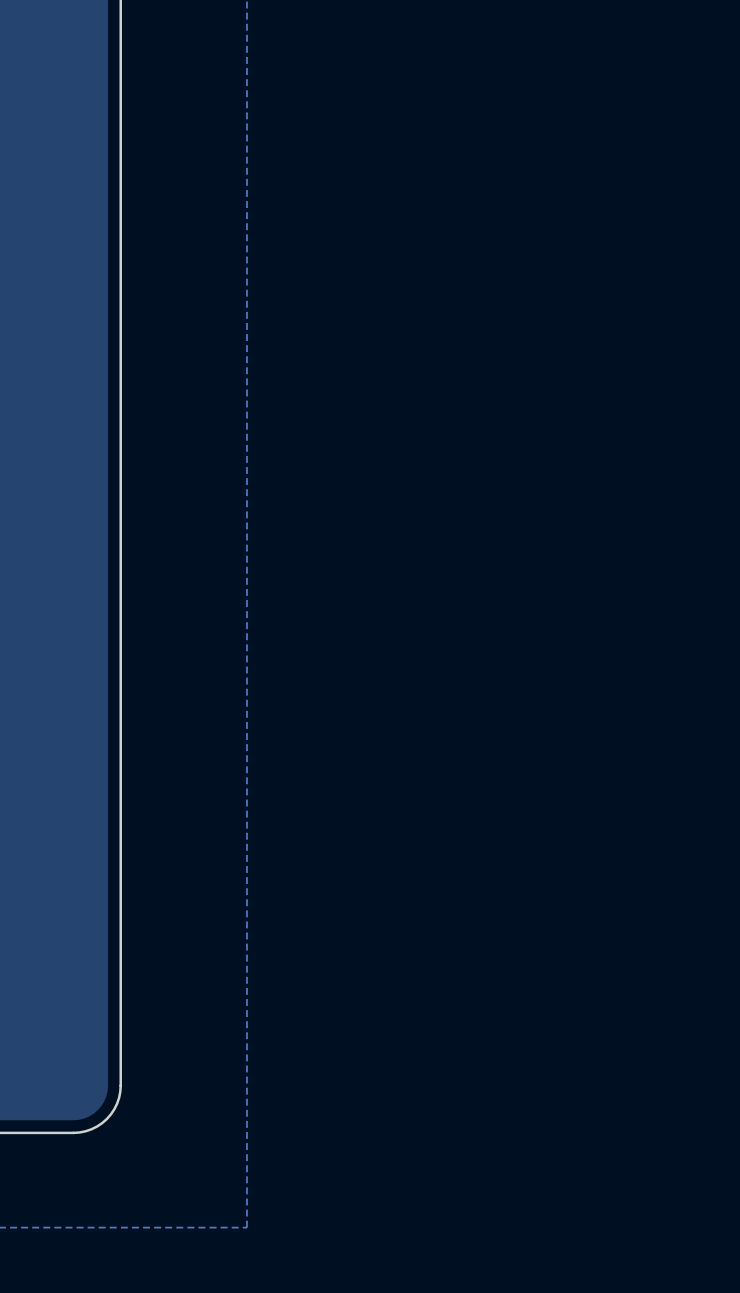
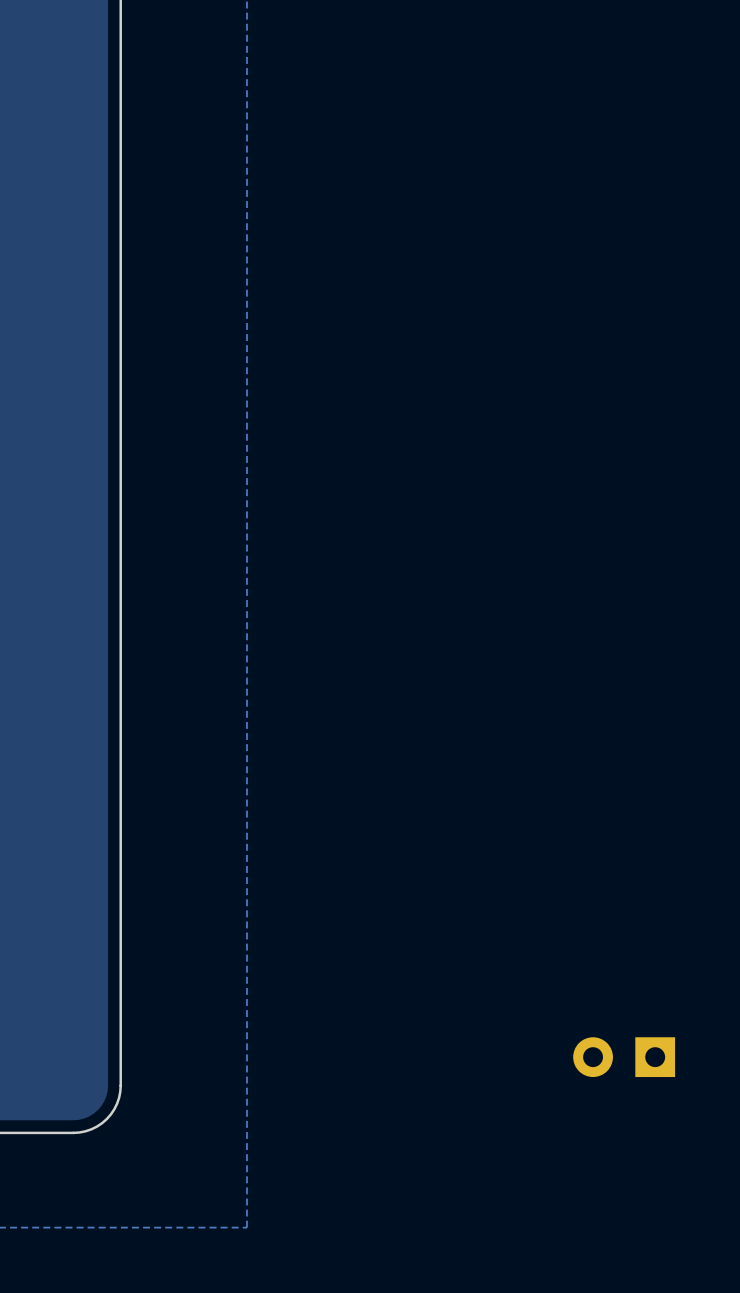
part: none -> (624, 1057)

